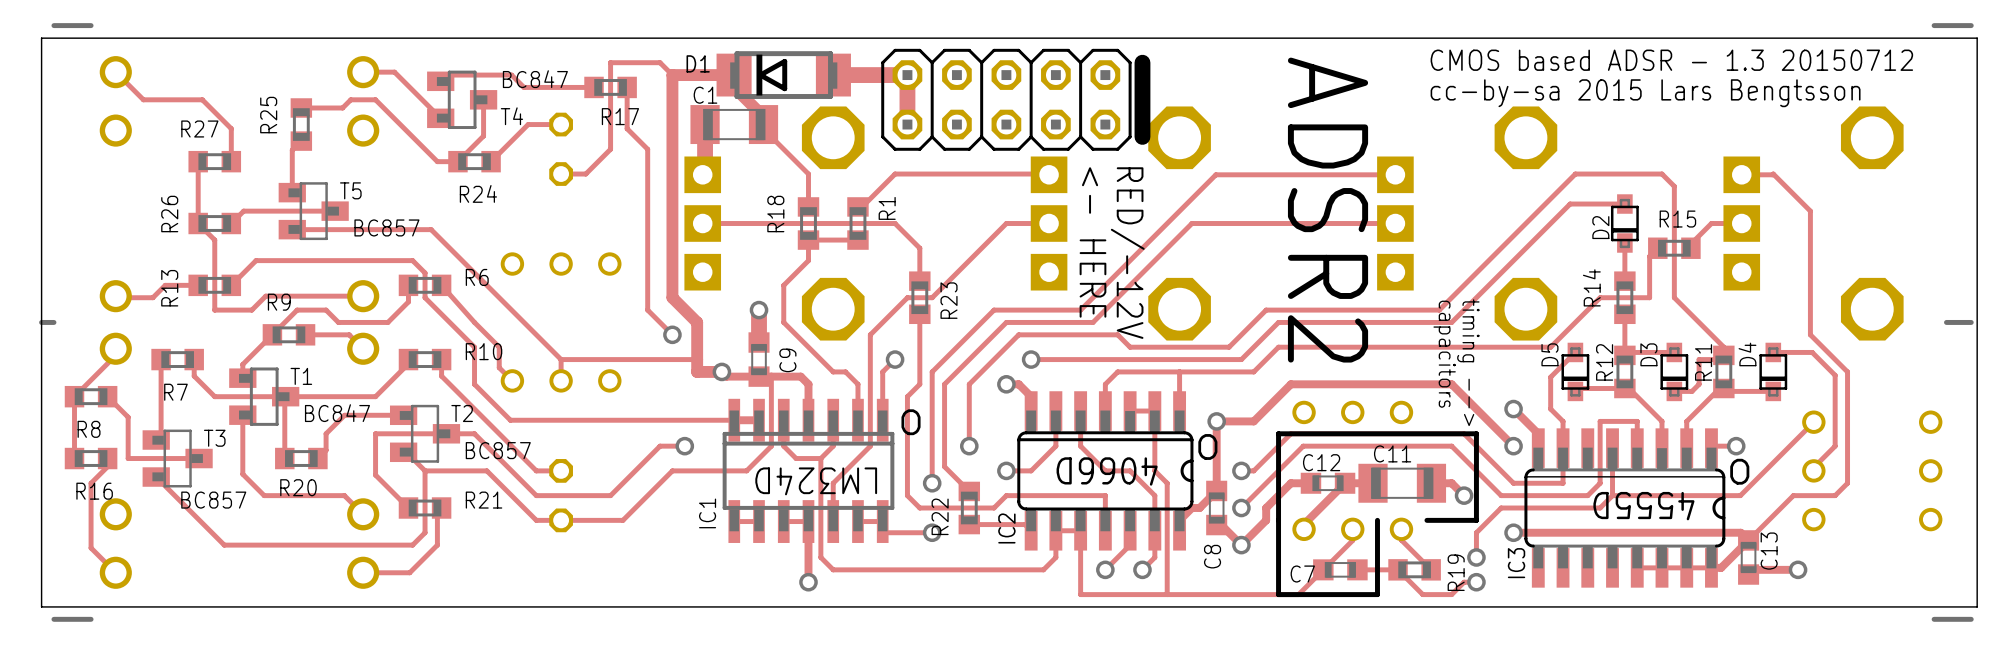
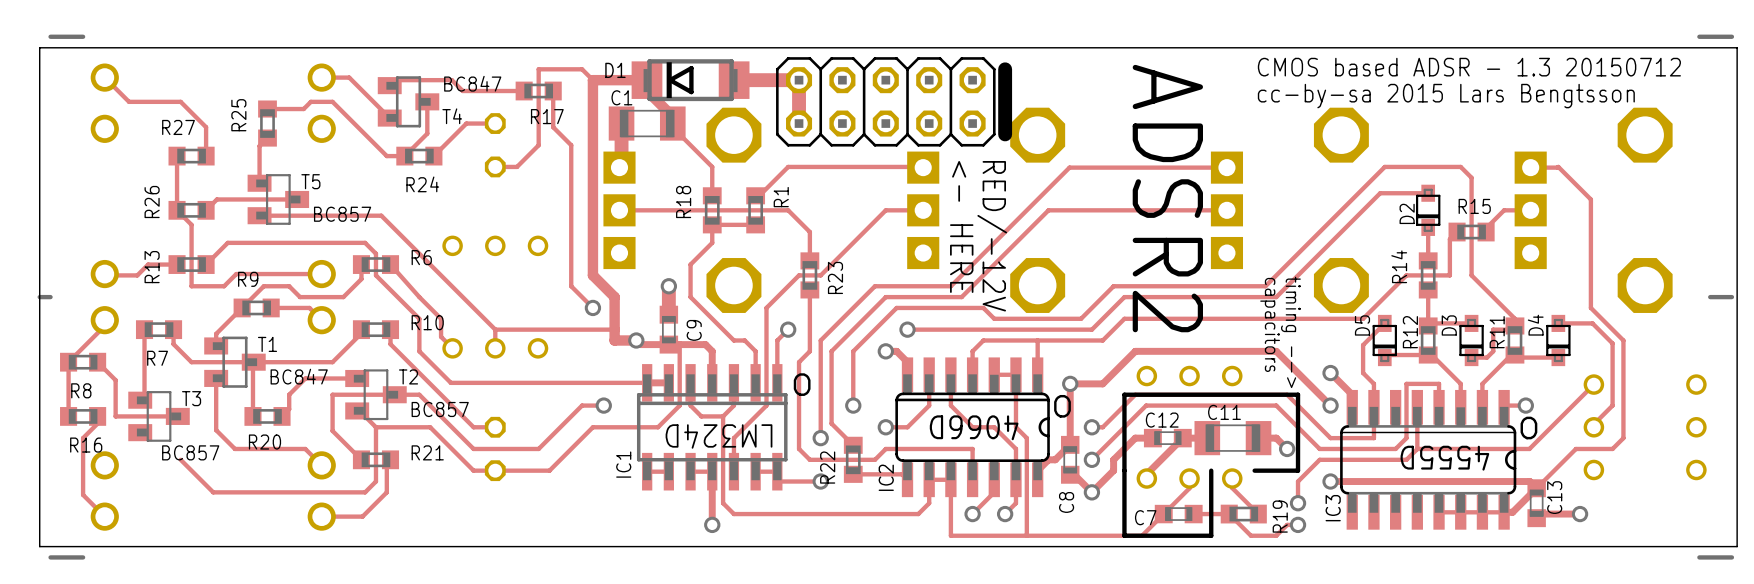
track: (156, 477) (224, 545) (239, 545) -> (180, 459) (213, 492)

